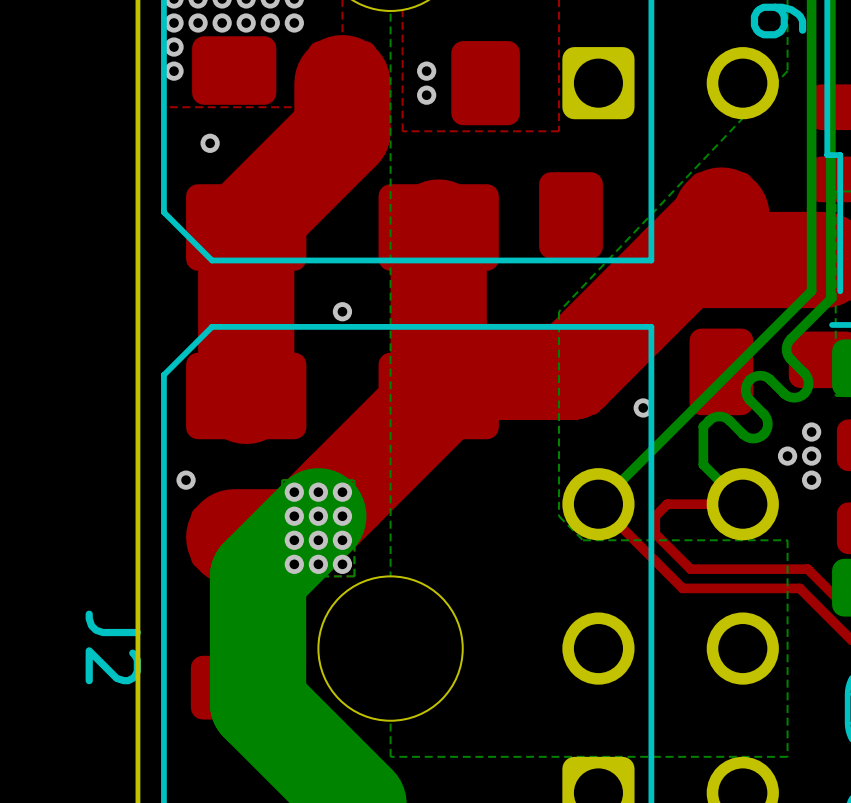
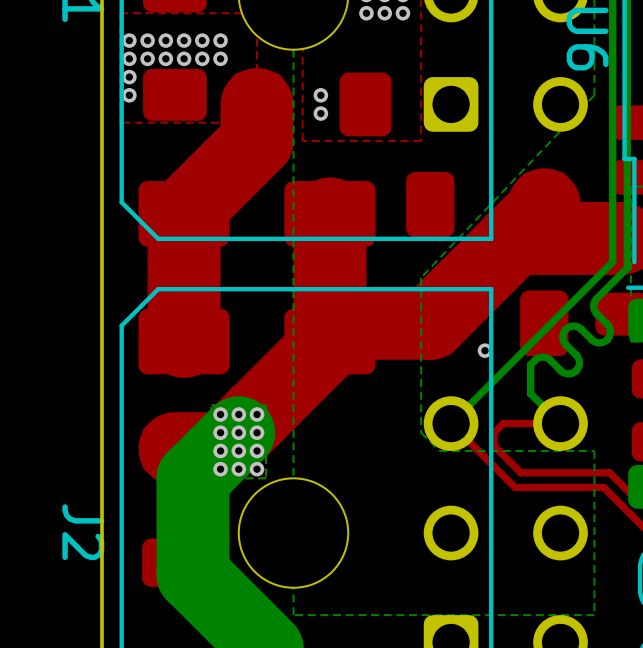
via: (210, 143) -> none
via: (342, 311) -> none
via: (811, 432) -> none
via: (787, 456) -> none
via: (811, 456) -> none
via: (186, 480) -> none
via: (811, 480) -> none

